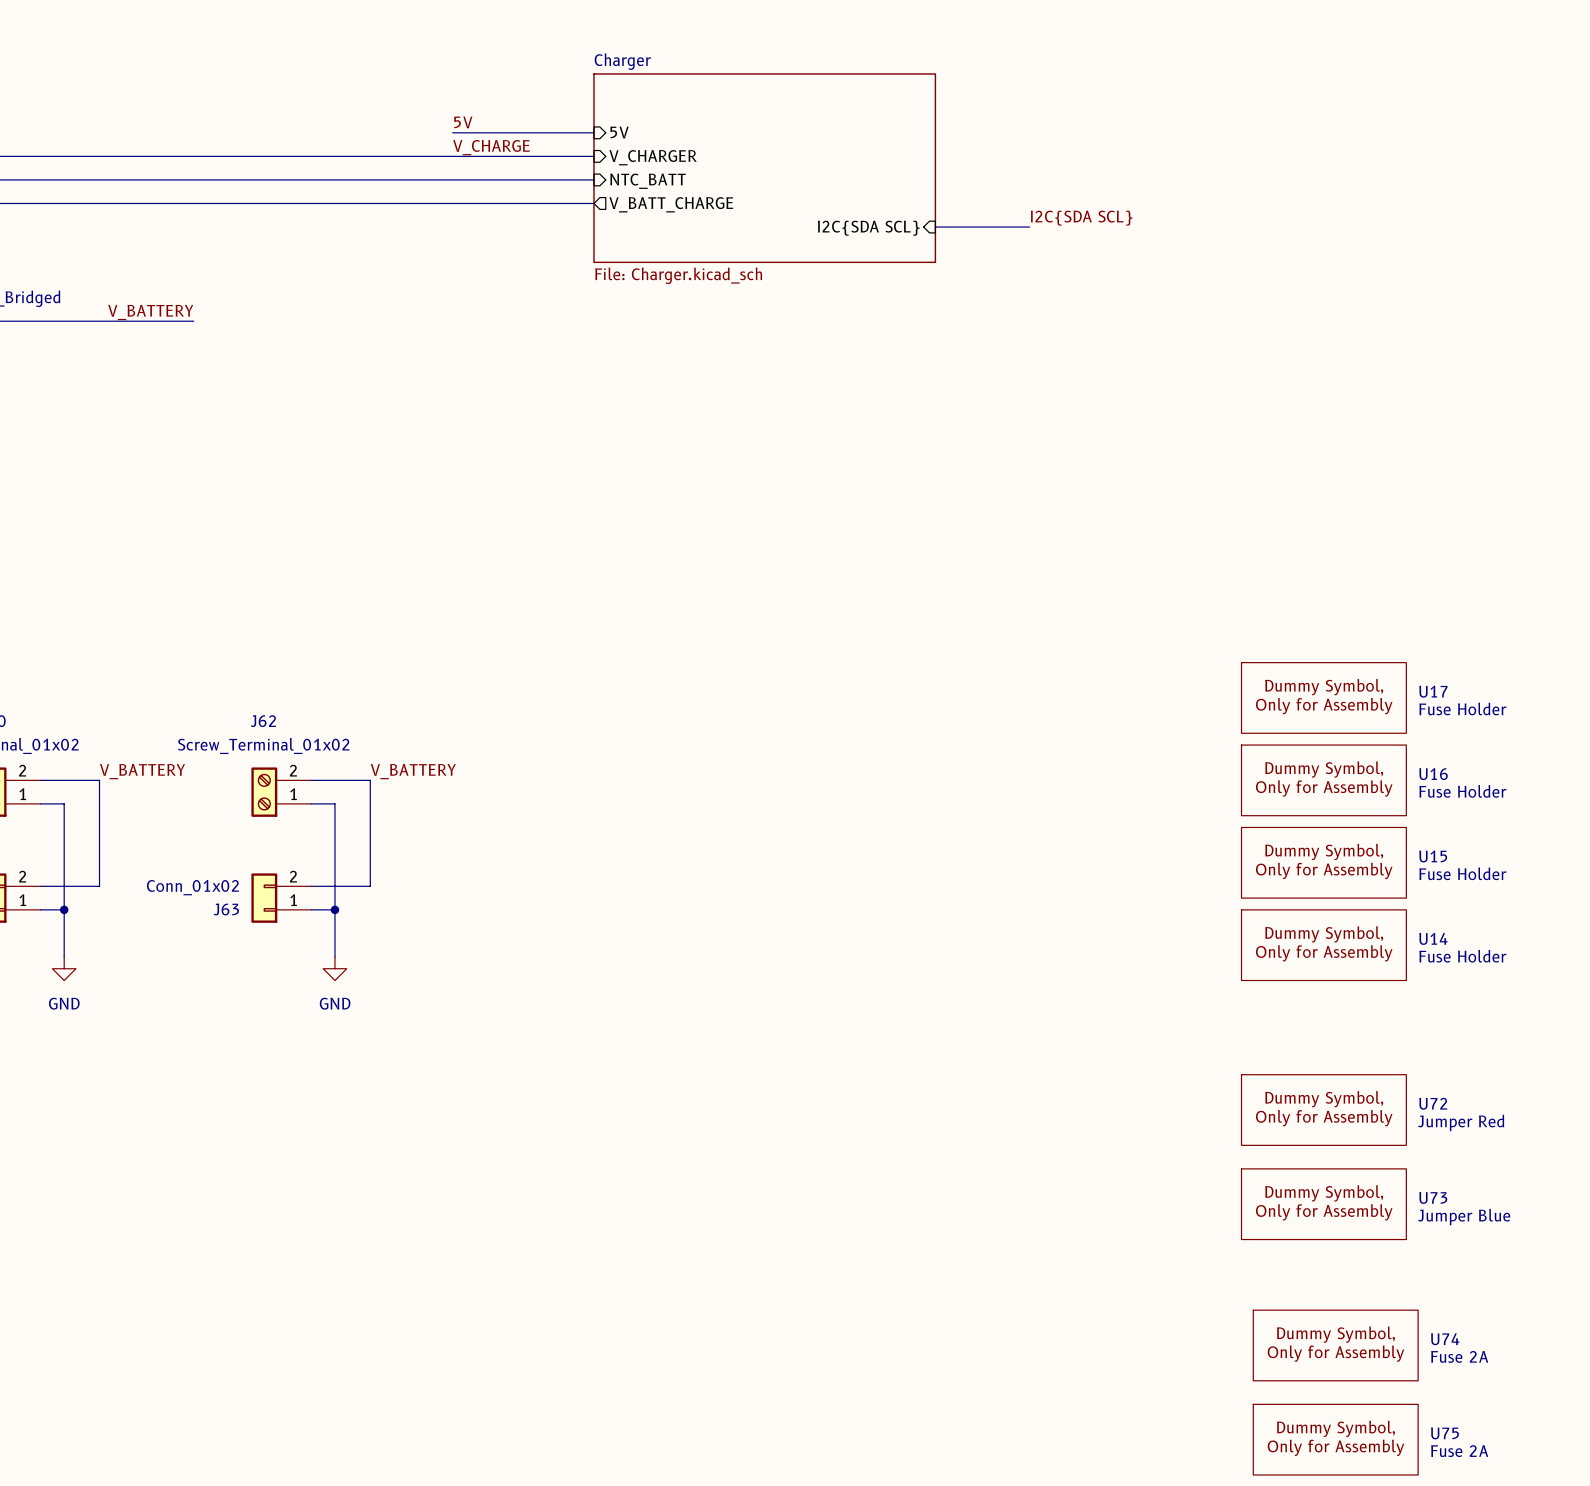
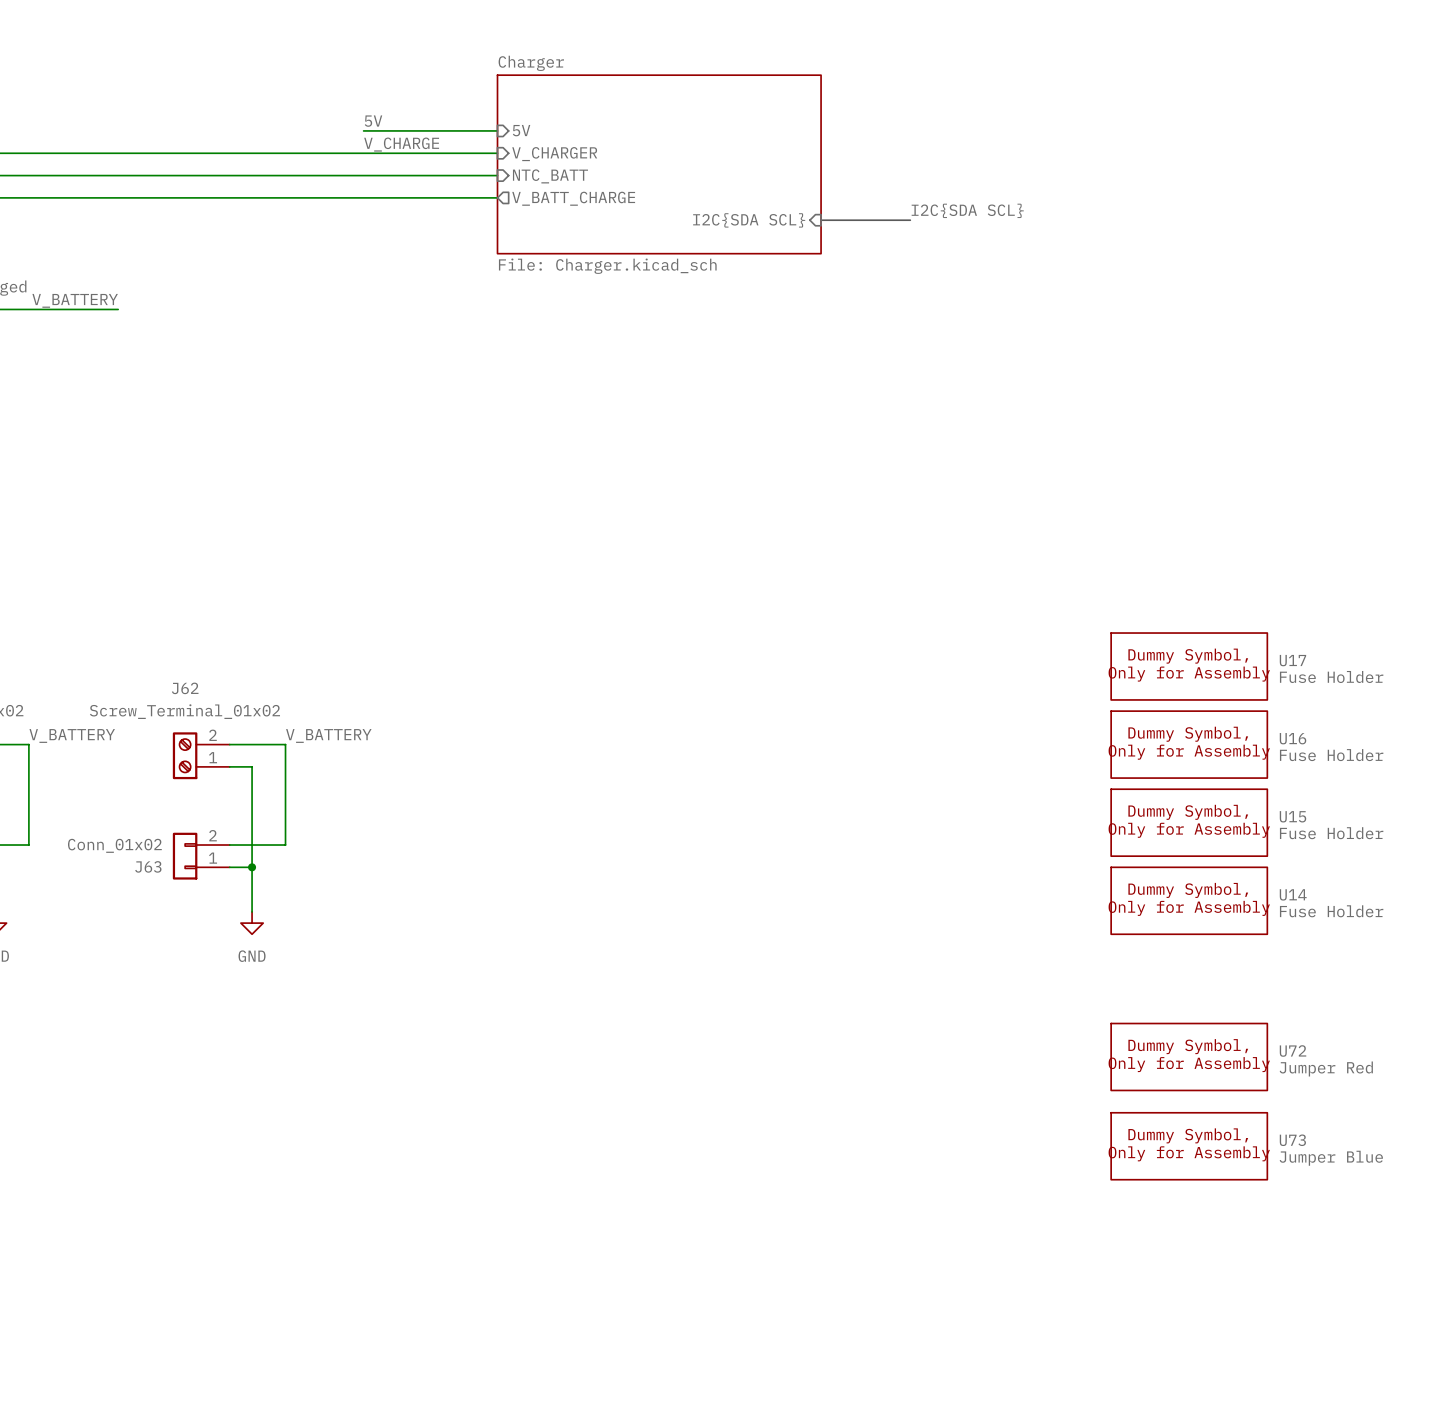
U74: Fuse 2A (1335, 1345) -> none
U75: Fuse 2A (1335, 1439) -> none

